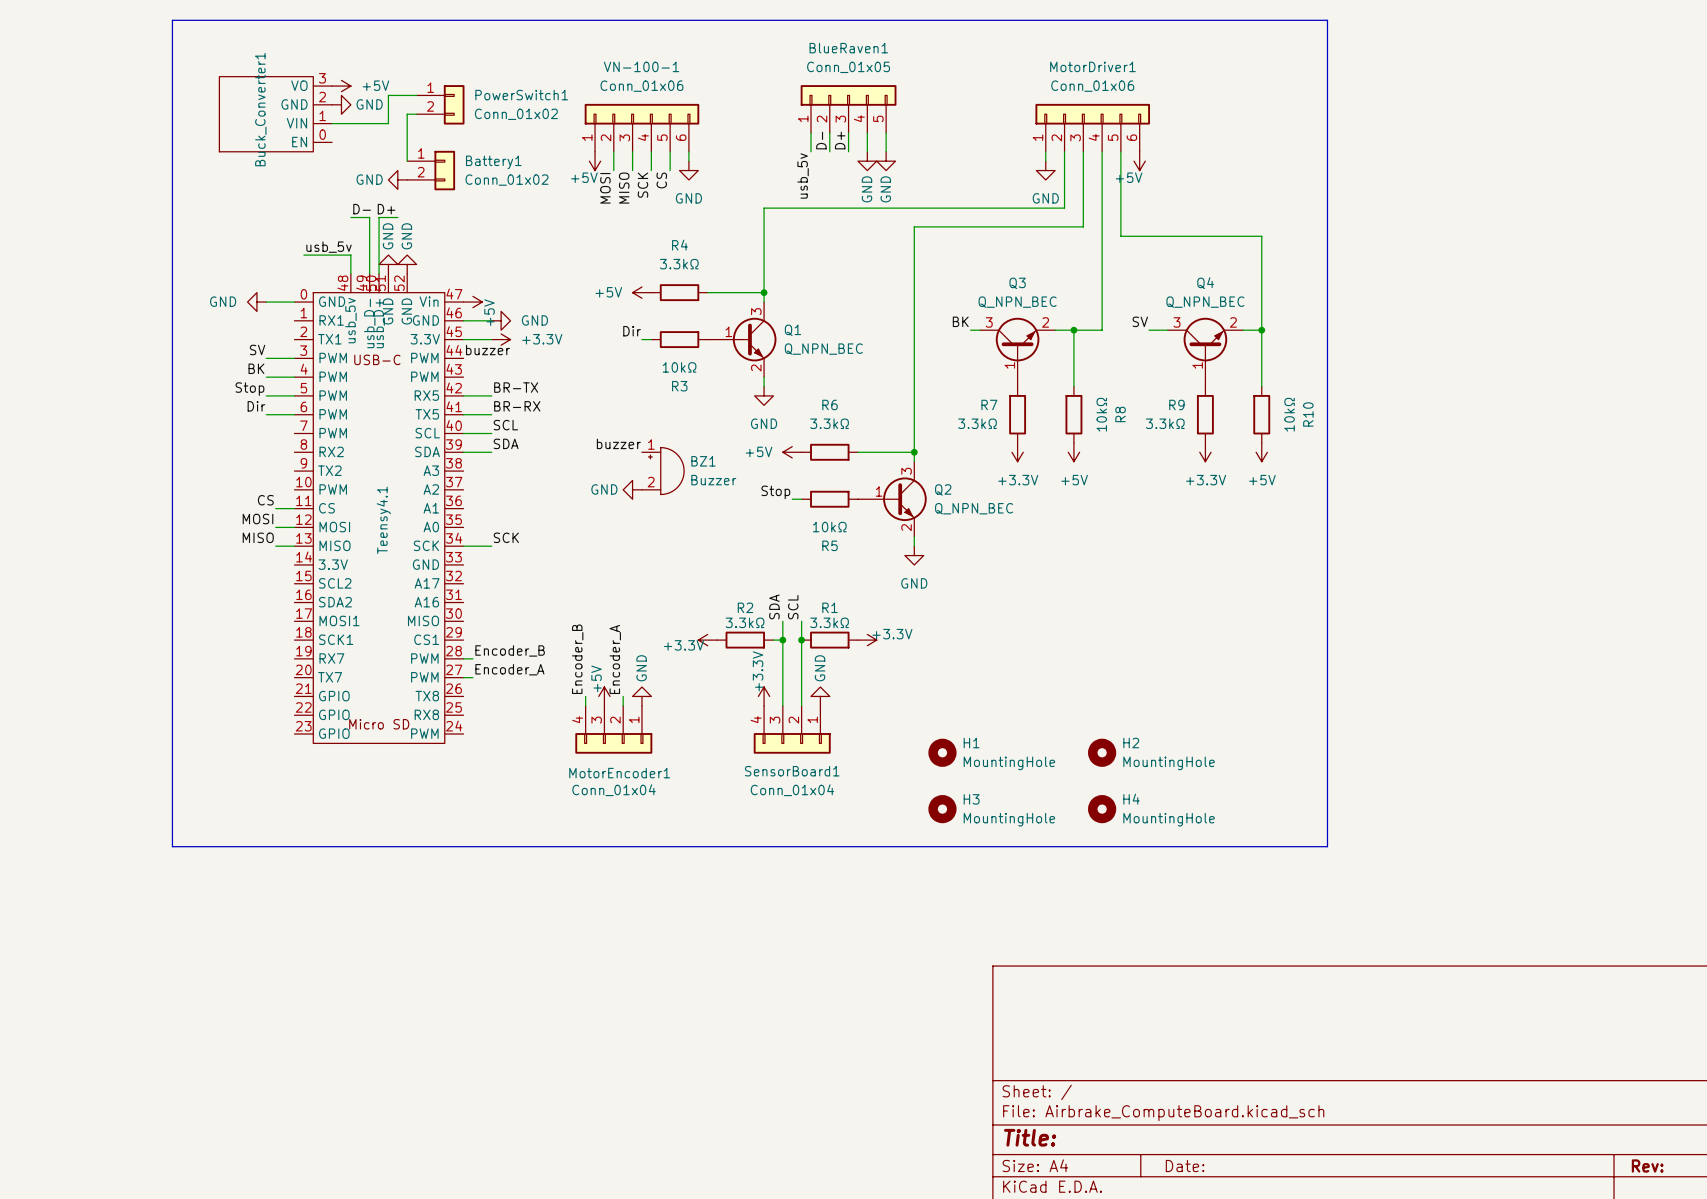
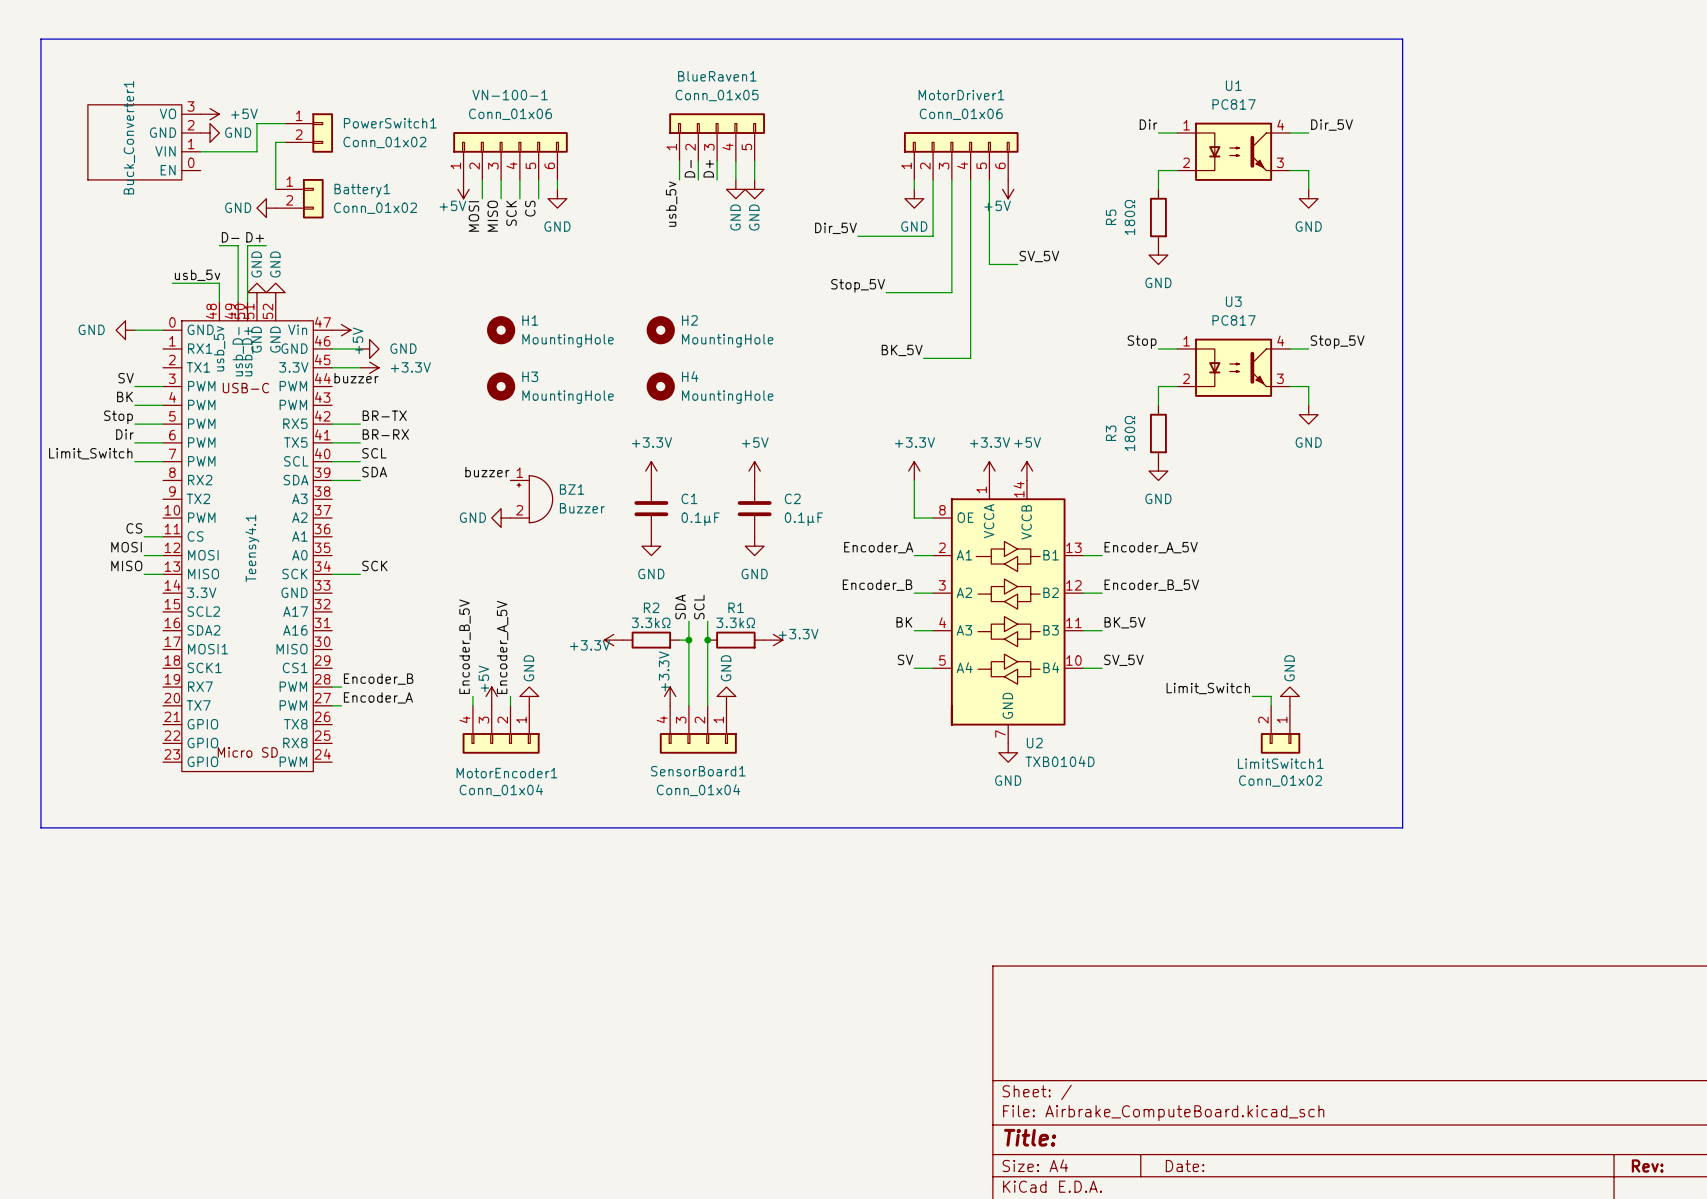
line: (172, 20) (1327, 20) (1327, 846) (172, 846) (172, 20) -> (40, 39) (40, 827) (1402, 827) (1402, 39) (40, 39)
power symbol: +5V (341, 86) -> none
wire: (416, 95) (388, 95) (388, 123) (332, 123) -> (285, 123) (256, 123) (256, 151) (200, 151)
power symbol: GND (341, 104) -> none
PowerSwitch1 position: (440, 104) -> (309, 133)
BlueRaven1 position: (848, 109) -> (717, 137)
power symbol: none -> +5V (210, 114)
Buck_Converter1 position: (275, 114) -> (144, 142)
wire: (416, 114) (407, 114) (407, 161) -> (285, 142) (275, 142) (275, 189)
label: none -> Dir (1148, 124)
label: none -> Dir_5V (1332, 125)
VN-100-1 position: (641, 127) -> (510, 156)
MotorDriver1 position: (1092, 127) -> (961, 156)
power symbol: none -> GND (210, 133)
wire: (811, 133) (811, 151) -> (679, 161) (679, 179)
wire: (829, 133) (829, 151) -> (698, 161) (698, 179)
wire: (848, 133) (848, 151) -> (717, 161) (717, 179)
wire: (867, 133) (867, 151) -> (735, 161) (735, 179)
wire: (886, 133) (886, 151) -> (754, 161) (754, 179)
wire: none -> (1158, 133) (1177, 133)
wire: none -> (1289, 133) (1308, 133)
label position: D- (821, 140) -> D- (689, 168)
label position: D+ (840, 140) -> D+ (708, 168)
wire: (613, 151) (613, 170) -> (482, 179) (482, 198)
wire: (632, 151) (632, 170) -> (501, 179) (501, 198)
wire: (651, 151) (651, 170) -> (519, 179) (519, 198)
wire: (670, 151) (670, 170) -> (538, 179) (538, 198)
wire: (688, 151) (688, 161) -> (557, 179) (557, 189)
wire: (1045, 151) (1045, 161) -> (914, 179) (914, 189)
wire: (1064, 151) (1064, 208) (764, 208) (764, 302) -> none
wire: (1083, 151) (1083, 226) (914, 226) (914, 461) -> none
wire: (1102, 151) (1102, 330) (1055, 330) -> (970, 179) (970, 358) (923, 358)
wire: (1120, 151) (1120, 236) (1261, 236) (1261, 386) -> none
U1: none -> PC817 (1233, 151)
power symbol: +5V (595, 161) -> none
power symbol: GND (867, 161) -> none
power symbol: GND (886, 161) -> none
power symbol position: +5V (1139, 161) -> +5V (1008, 189)
Battery1 position: (431, 170) -> (299, 198)
power symbol: GND (688, 170) -> none
power symbol: GND (1045, 170) -> none
wire: none -> (1177, 170) (1158, 170) (1158, 189)
wire: none -> (1289, 170) (1308, 170) (1308, 189)
label position: usb_5v (803, 176) -> usb_5v (671, 204)
power symbol: GND (397, 179) -> none
wire: none -> (933, 179) (933, 236) (857, 236)
wire: none -> (951, 179) (951, 292) (886, 292)
wire: none -> (989, 179) (989, 264) (1017, 264)
label position: CS (661, 180) -> CS (530, 208)
label position: SCK (642, 185) -> SCK (511, 213)
label position: MOSI (605, 188) -> MOSI (473, 216)
label position: MISO (624, 188) -> MISO (492, 216)
power symbol: none -> +5V (463, 189)
power symbol: none -> GND (735, 189)
power symbol: none -> GND (754, 189)
power symbol: none -> GND (557, 198)
power symbol: none -> GND (914, 198)
power symbol: none -> GND (1308, 198)
power symbol: none -> GND (266, 208)
label position: D- (362, 209) -> D- (230, 237)
label position: D+ (386, 209) -> D+ (255, 237)
wire: (350, 217) (369, 217) (369, 273) -> (219, 245) (238, 245) (238, 302)
wire: (397, 217) (379, 217) (379, 273) -> (266, 245) (247, 245) (247, 302)
label: none -> Dir_5V (835, 228)
label position: usb_5v (329, 247) -> usb_5v (197, 275)
wire: (303, 255) (350, 255) (350, 273) -> (172, 283) (219, 283) (219, 302)
power symbol: none -> GND (1158, 255)
label: none -> SV_5V (1039, 256)
power symbol: GND (388, 264) -> none
power symbol: GND (407, 264) -> none
label: none -> Stop_5V (858, 285)
power symbol: none -> GND (275, 292)
power symbol: +5V (641, 292) -> none
R4: 3.3kΩ (679, 292) -> none
wire: (707, 292) (764, 292) -> none
junction: (764, 292) -> none
power symbol rotation: 0° (256, 302) -> 90° clockwise (256, 292)
wire: (266, 302) (294, 302) -> (134, 330) (163, 330)
power symbol: +5V (472, 302) -> none
wire: (463, 320) (491, 320) -> (332, 348) (360, 348)
power symbol: GND (501, 320) -> none
label: BK (960, 321) -> none
label: SV (1140, 321) -> none
power symbol: none -> GND (125, 330)
power symbol: none -> +5V (341, 330)
wire: (970, 330) (980, 330) -> none
wire: (1073, 330) (1073, 386) -> none
junction: (1073, 330) -> none
wire: (1149, 330) (1167, 330) -> (1158, 348) (1177, 348)
wire: (1242, 330) (1261, 330) -> (1289, 348) (1308, 348)
junction: (1261, 330) -> none
label: Dir (632, 331) -> none
wire: (463, 339) (491, 339) -> (332, 367) (360, 367)
power symbol: +3.3V (501, 339) -> none
wire: (641, 339) (651, 339) -> none
R3 rotation: 0° (679, 339) -> 90° clockwise (1158, 433)
R3 position: (679, 339) -> (1158, 433)
Q1: Q_NPN_BEC (742, 339) -> none
label: none -> Stop (1142, 342)
label: none -> Stop_5V (1337, 342)
power symbol: none -> GND (369, 348)
label position: SV (257, 349) -> SV (126, 378)
label: buzzer (487, 349) -> none
label: none -> BK_5V (902, 350)
Q3: Q_NPN_BEC (1017, 352) -> none
Q4: Q_NPN_BEC (1205, 352) -> none
wire: (266, 358) (294, 358) -> (134, 386) (163, 386)
power symbol: none -> +3.3V (369, 367)
R3 value: 10kΩ (679, 367) -> 180Ω (1129, 433)
U3: none -> PC817 (1233, 367)
label position: BK (256, 368) -> BK (124, 396)
wire: (266, 377) (294, 377) -> (134, 405) (163, 405)
wire: (764, 377) (764, 386) -> none
label: none -> buzzer (356, 378)
wire: none -> (1177, 386) (1158, 386) (1158, 405)
wire: none -> (1289, 386) (1308, 386) (1308, 405)
label position: BR-TX (516, 387) -> BR-TX (384, 415)
label position: Stop (249, 389) -> Stop (118, 417)
wire: (266, 395) (294, 395) -> (134, 424) (163, 424)
wire: (463, 395) (491, 395) -> (332, 424) (360, 424)
power symbol: GND (764, 395) -> none
label position: Dir (256, 406) -> Dir (124, 434)
label position: BR-RX (517, 406) -> BR-RX (385, 434)
wire: (266, 414) (294, 414) -> (134, 442) (163, 442)
wire: (463, 414) (491, 414) -> (332, 442) (360, 442)
R7: 3.3kΩ (1017, 414) -> none
R8: 10kΩ (1073, 414) -> none
R9: 3.3kΩ (1205, 414) -> none
R10: 10kΩ (1261, 414) -> none
power symbol: none -> GND (1308, 414)
label position: SCL (505, 425) -> SCL (374, 453)
wire: (463, 433) (491, 433) -> (332, 461) (360, 461)
label: SDA (506, 443) -> none
label: buzzer (618, 443) -> none
wire: (463, 452) (491, 452) -> (332, 480) (360, 480)
power symbol rotation: 0° (792, 452) -> 90° clockwise (754, 471)
power symbol position: +5V (792, 452) -> +5V (754, 471)
R6: 3.3kΩ (829, 452) -> none
wire: (857, 452) (914, 452) -> none
junction: (914, 452) -> none
power symbol rotation: 0° (1017, 452) -> 180° (989, 471)
power symbol position: +3.3V (1017, 452) -> +3.3V (989, 471)
power symbol rotation: 0° (1073, 452) -> 180° (1026, 471)
power symbol position: +5V (1073, 452) -> +5V (1026, 471)
power symbol: +3.3V (1205, 452) -> none
power symbol: +5V (1261, 452) -> none
label: none -> Limit_Switch (90, 453)
wire: none -> (134, 461) (163, 461)
power symbol: none -> +3.3V (651, 471)
BZ1 position: (663, 471) -> (531, 499)
power symbol: none -> +3.3V (914, 471)
power symbol: none -> GND (1158, 471)
label: none -> SDA (374, 472)
label: none -> buzzer (487, 472)
wire: none -> (914, 480) (914, 518) (933, 518)
power symbol rotation: 0° (632, 489) -> 90° counterclockwise (651, 546)
power symbol position: GND (632, 489) -> GND (651, 546)
label: Stop (775, 492) -> none
wire: (792, 499) (801, 499) -> none
R5 rotation: 0° (829, 499) -> 90° clockwise (1158, 217)
R5 position: (829, 499) -> (1158, 217)
Q2: Q_NPN_BEC (892, 499) -> none
label position: CS (265, 500) -> CS (134, 528)
wire: (275, 508) (294, 508) -> (144, 536) (163, 536)
Teensy4.1 position: (379, 508) -> (247, 536)
C1: none -> 0.1µF (651, 508)
C2: none -> 0.1µF (754, 508)
power symbol: none -> GND (501, 518)
label position: MOSI (258, 519) -> MOSI (126, 547)
wire: (275, 527) (294, 527) -> (144, 555) (163, 555)
R5 value: 10kΩ (829, 527) -> 180Ω (1129, 217)
wire: (914, 536) (914, 546) -> none
label position: MISO (258, 537) -> MISO (126, 565)
label position: SCK (506, 537) -> SCK (374, 565)
wire: (275, 546) (294, 546) -> (144, 574) (163, 574)
wire: (463, 546) (491, 546) -> (332, 574) (360, 574)
power symbol: none -> GND (754, 546)
label: none -> Encoder_A (878, 547)
label: none -> Encoder_A_5V (1151, 547)
wire: none -> (914, 555) (933, 555)
power symbol: GND (914, 555) -> none
wire: none -> (1083, 555) (1102, 555)
label: none -> Encoder_B (877, 585)
label: none -> Encoder_B_5V (1151, 585)
wire: none -> (914, 593) (933, 593)
wire: none -> (1083, 593) (1102, 593)
label position: SDA (774, 606) -> SDA (680, 606)
label position: SCL (793, 607) -> SCL (699, 607)
U2: none -> TXB0104D (1008, 611)
wire: (782, 621) (782, 705) -> (688, 621) (688, 705)
wire: (801, 621) (801, 705) -> (707, 621) (707, 705)
label: none -> BK (904, 622)
label: none -> BK_5V (1124, 622)
wire: none -> (914, 630) (933, 630)
wire: none -> (1083, 630) (1102, 630)
power symbol: none -> +3.3V (613, 640)
junction: none -> (688, 640)
junction: none -> (707, 640)
power symbol: +3.3V (707, 640) -> none
R2 position: (745, 640) -> (651, 640)
power symbol: none -> +3.3V (773, 640)
junction: (782, 640) -> none
junction: (801, 640) -> none
R1 position: (829, 640) -> (735, 640)
power symbol: +3.3V (867, 640) -> none
label: none -> Encoder_B_5V (465, 646)
label: none -> Encoder_A_5V (502, 647)
label: Encoder_B (510, 650) -> none
wire: (463, 658) (472, 658) -> (332, 687) (341, 687)
label: Encoder_B (577, 659) -> none
label: Encoder_A (615, 659) -> none
label: none -> SV (905, 659)
label: none -> SV_5V (1123, 660)
wire: none -> (914, 668) (933, 668)
wire: none -> (1083, 668) (1102, 668)
label position: Encoder_A (509, 669) -> Encoder_A (378, 697)
wire: (463, 677) (472, 677) -> (332, 705) (341, 705)
label: none -> Encoder_B (378, 679)
label: none -> Limit_Switch (1208, 688)
power symbol: none -> GND (529, 696)
wire: (585, 696) (585, 705) -> (472, 696) (472, 705)
power symbol position: +5V (604, 696) -> +5V (491, 696)
wire: (623, 696) (623, 705) -> (510, 696) (510, 705)
power symbol: GND (641, 696) -> none
power symbol: none -> +3.3V (670, 696)
power symbol: none -> GND (726, 696)
power symbol: +3.3V (764, 696) -> none
power symbol: GND (820, 696) -> none
wire: none -> (1252, 696) (1271, 696) (1271, 705)
power symbol: none -> GND (1289, 696)
MotorEncoder1 position: (613, 729) -> (501, 729)
SensorBoard1 position: (792, 729) -> (698, 729)
LimitSwitch1: none -> Conn_01x02 (1280, 729)
H1 position: (942, 752) -> (501, 330)
power symbol: none -> GND (1008, 752)
H2 position: (1102, 752) -> (660, 330)
H3 position: (942, 809) -> (501, 386)
H4 position: (1102, 809) -> (660, 386)

